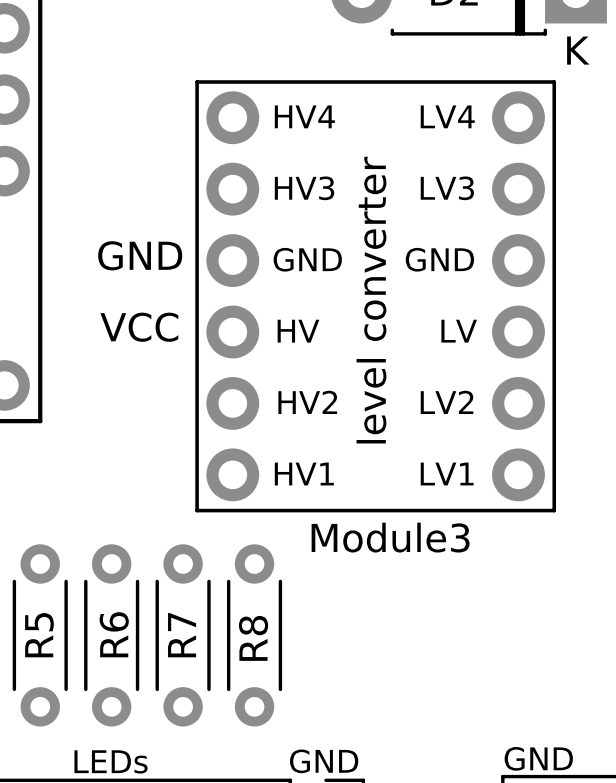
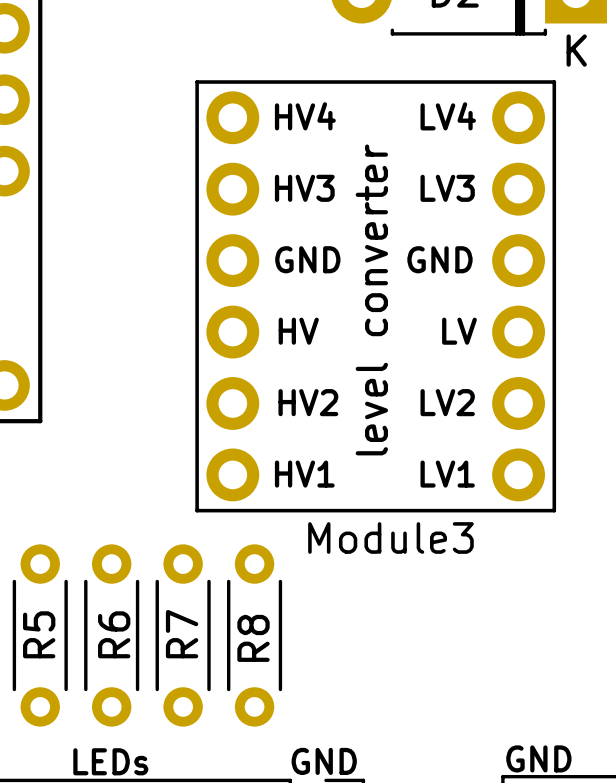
text: GND (140, 255) -> none
text: VCC (139, 327) -> none

